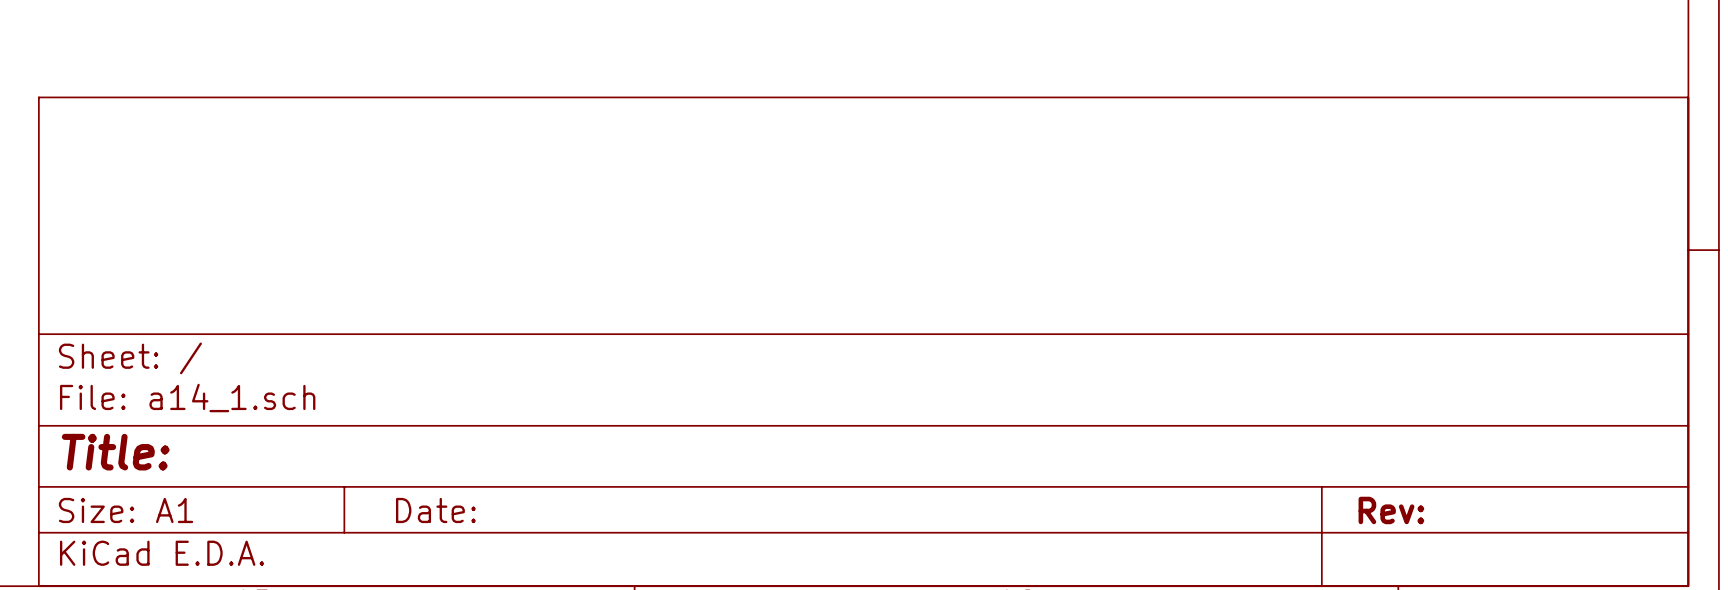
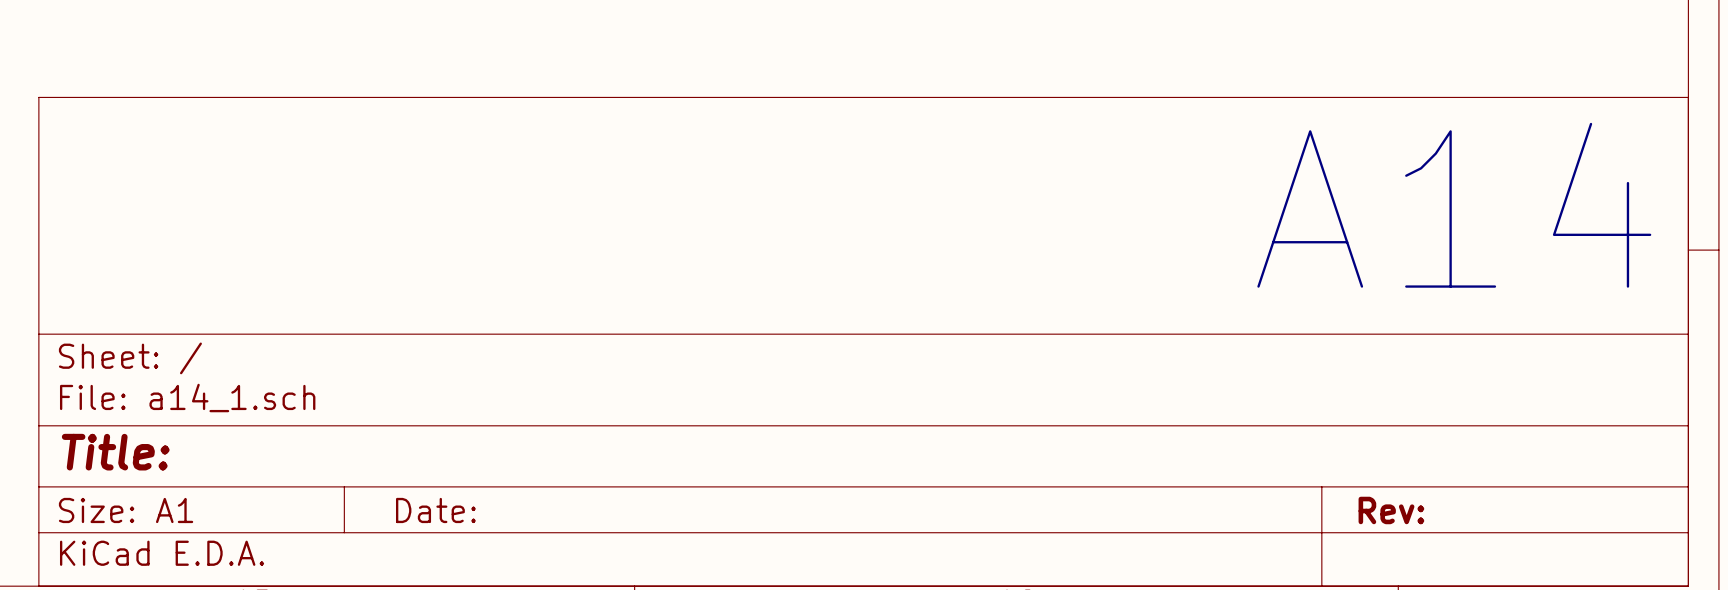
text: none -> A14 (1454, 205)

